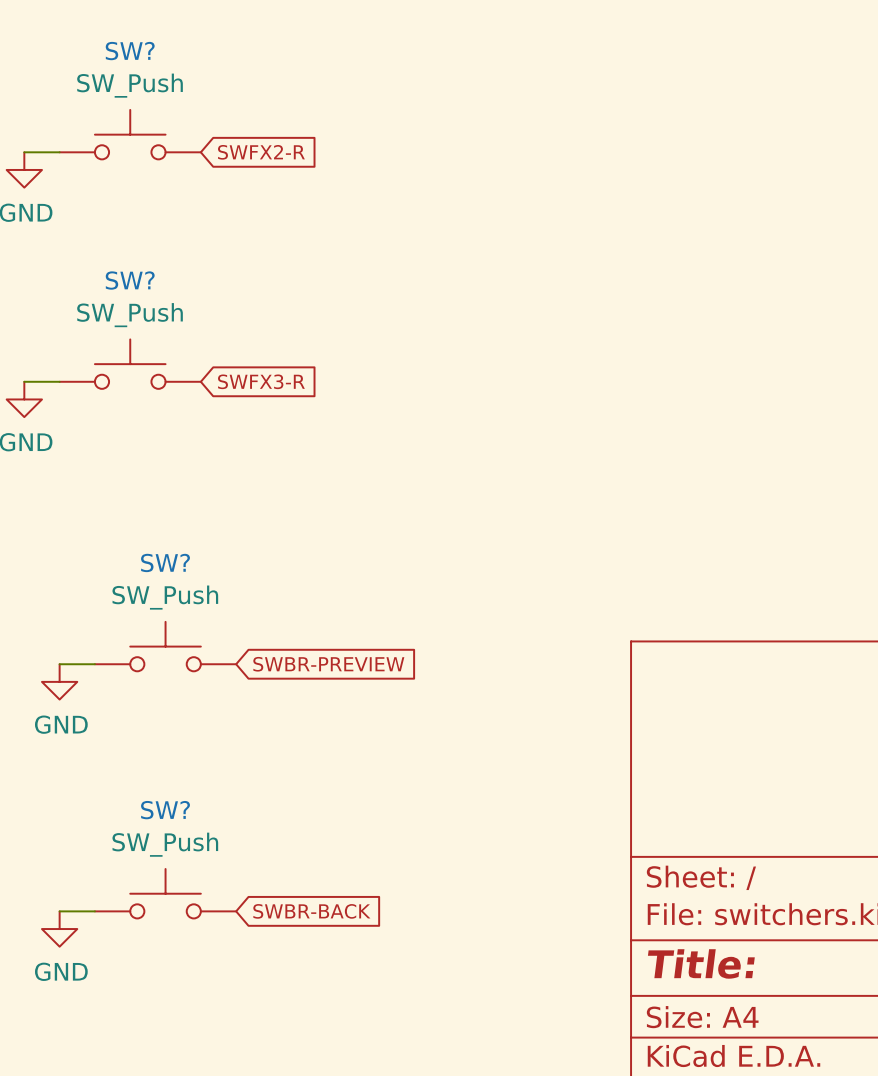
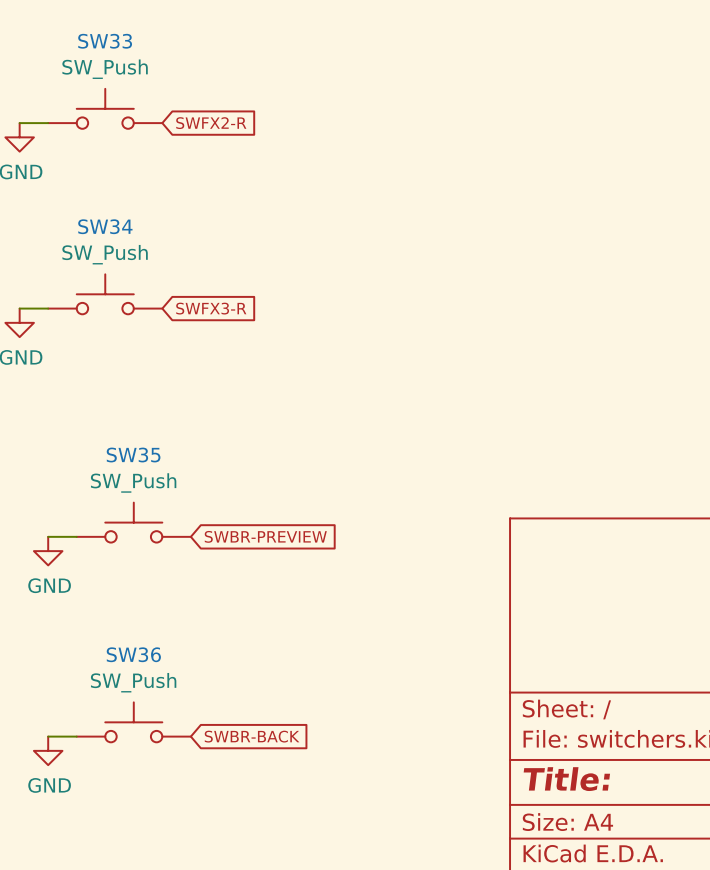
SW? name: SW? (130, 51) -> SW33 (105, 41)
SW? name: SW? (130, 280) -> SW34 (105, 226)
SW? name: SW? (165, 562) -> SW35 (133, 455)
SW? name: SW? (165, 810) -> SW36 (133, 654)

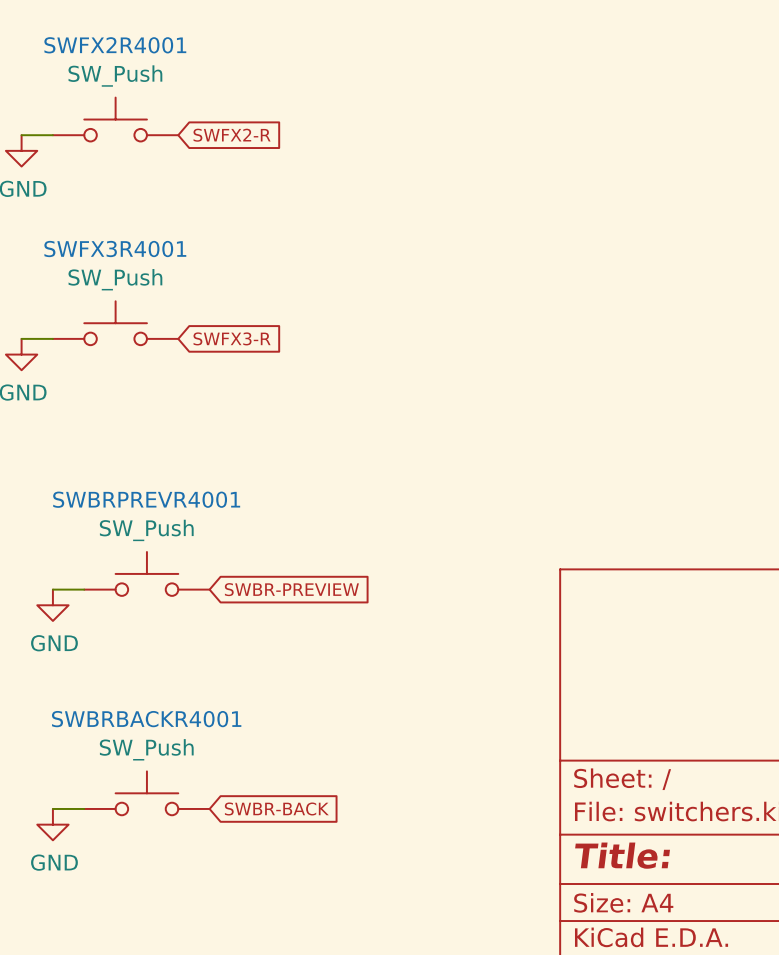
SW33 name: SW33 (105, 41) -> SWFX2R4001 (115, 45)
SW34 name: SW34 (105, 226) -> SWFX3R4001 (115, 249)
SW35 name: SW35 (133, 455) -> SWBRPREVR4001 (146, 499)
SW36 name: SW36 (133, 654) -> SWBRBACKR4001 (146, 719)

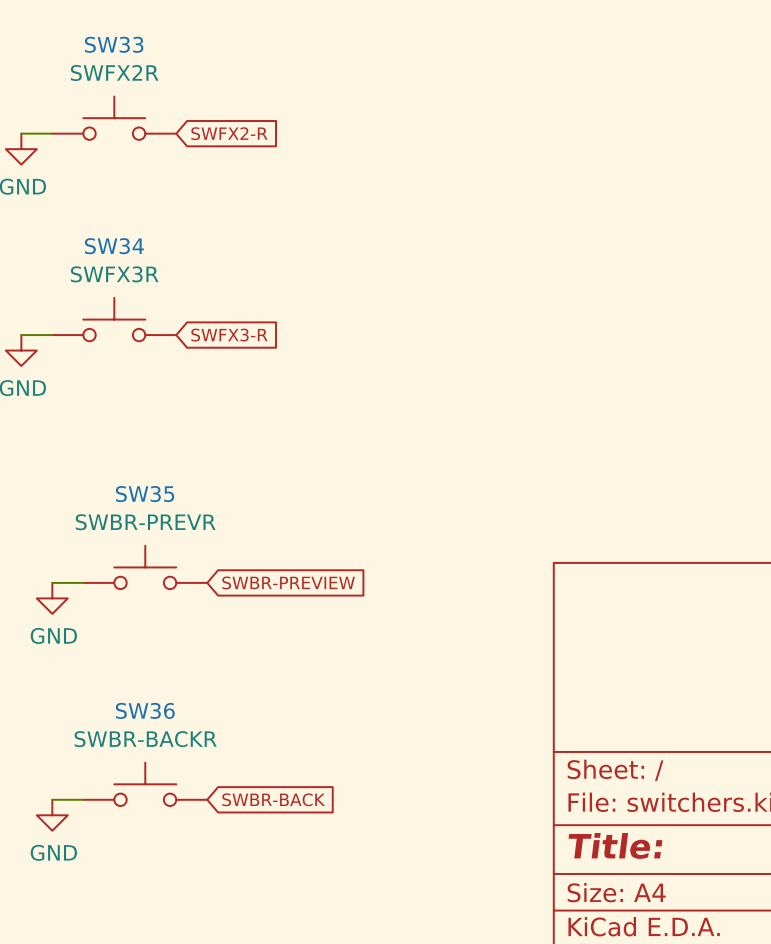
SWFX2R4001 name: SWFX2R4001 (115, 45) -> SW33 (114, 44)
SWFX2R4001 value: SW_Push (115, 76) -> SWFX2R (114, 72)
SWFX3R4001 name: SWFX3R4001 (115, 249) -> SW34 (114, 246)
SWFX3R4001 value: SW_Push (115, 279) -> SWFX3R (114, 274)
SWBRPREVR4001 name: SWBRPREVR4001 (146, 499) -> SW35 (145, 494)
SWBRPREVR4001 value: SW_Push (146, 530) -> SWBR-PREVR (145, 522)
SWBRBACKR4001 name: SWBRBACKR4001 (146, 719) -> SW36 (145, 710)
SWBRBACKR4001 value: SW_Push (146, 749) -> SWBR-BACKR (145, 739)

